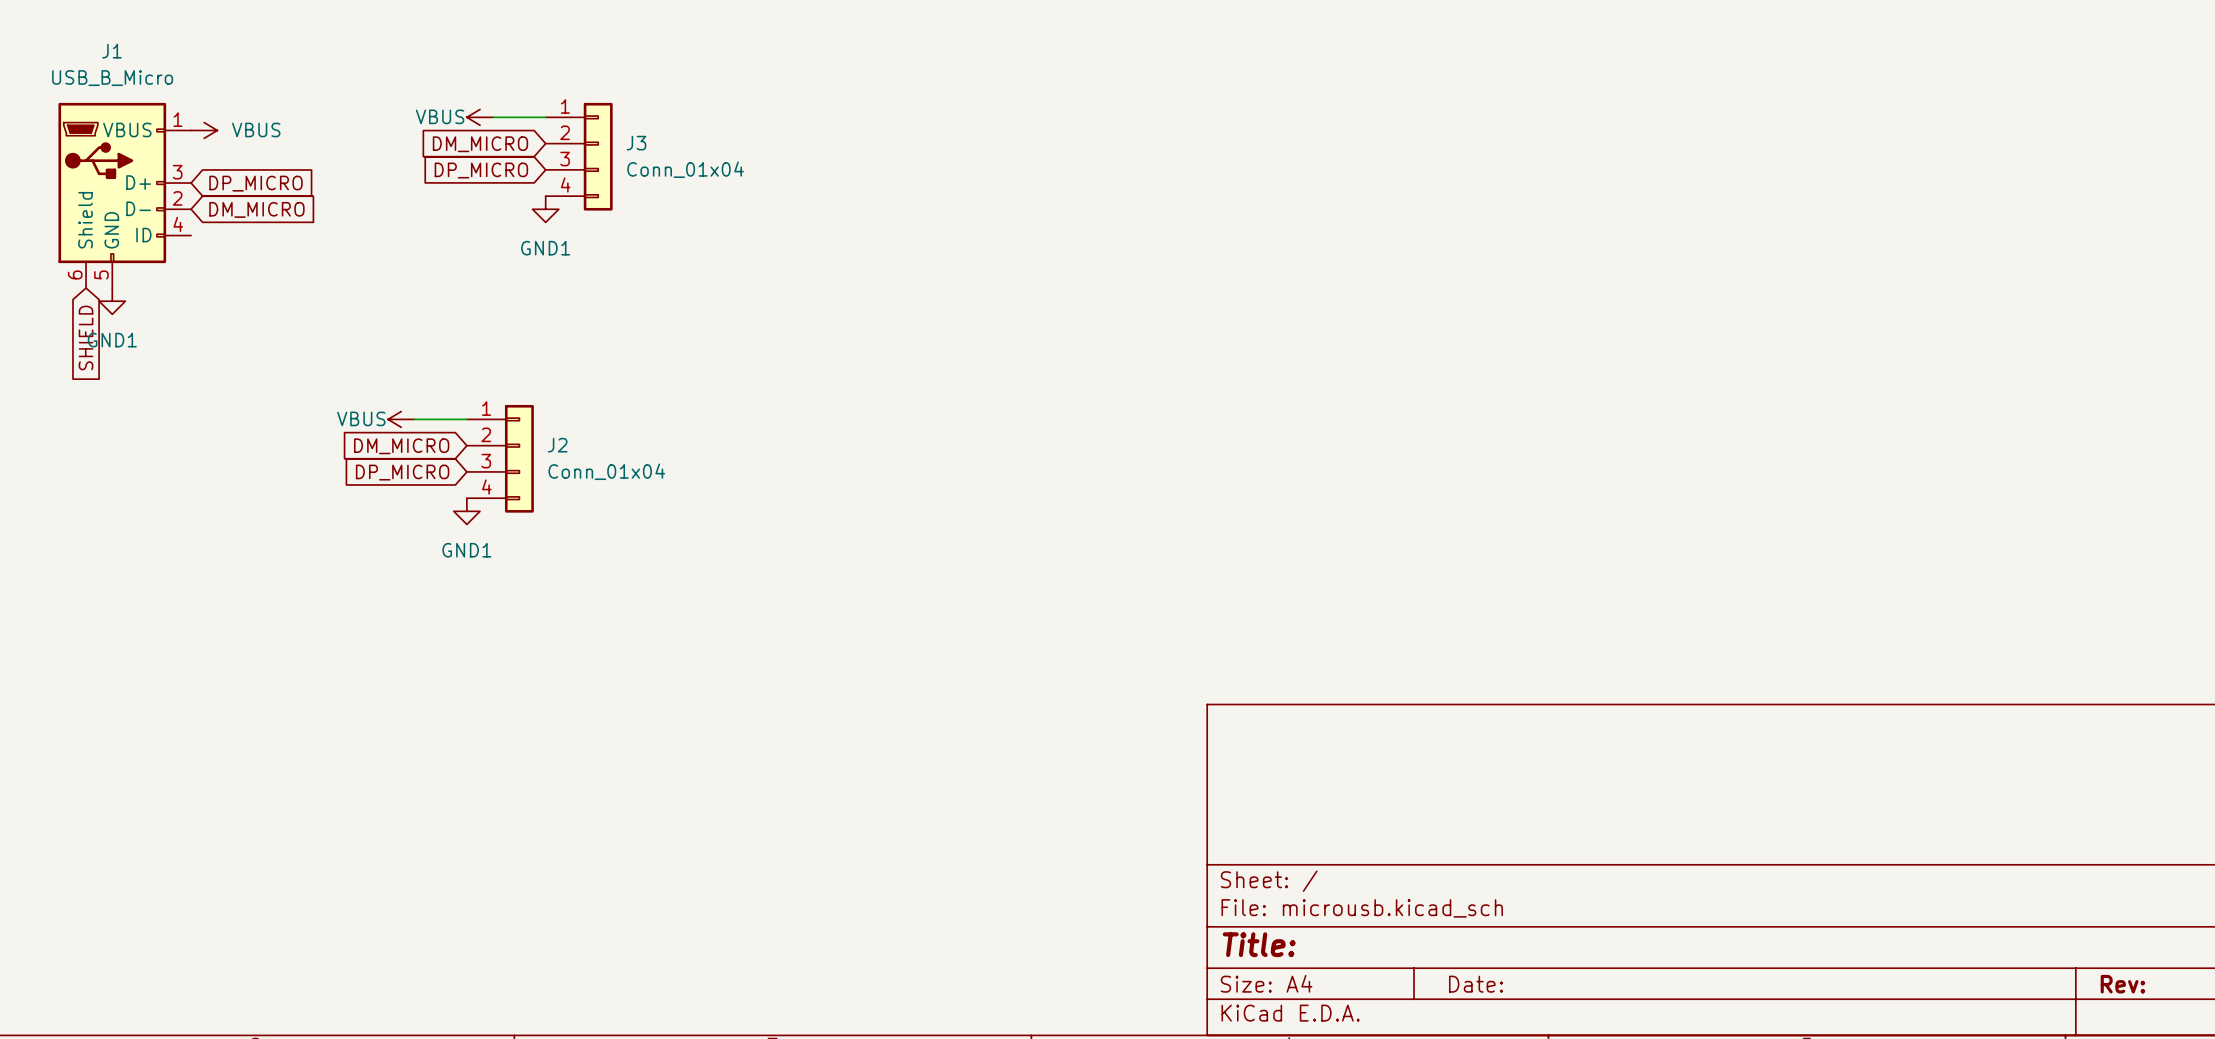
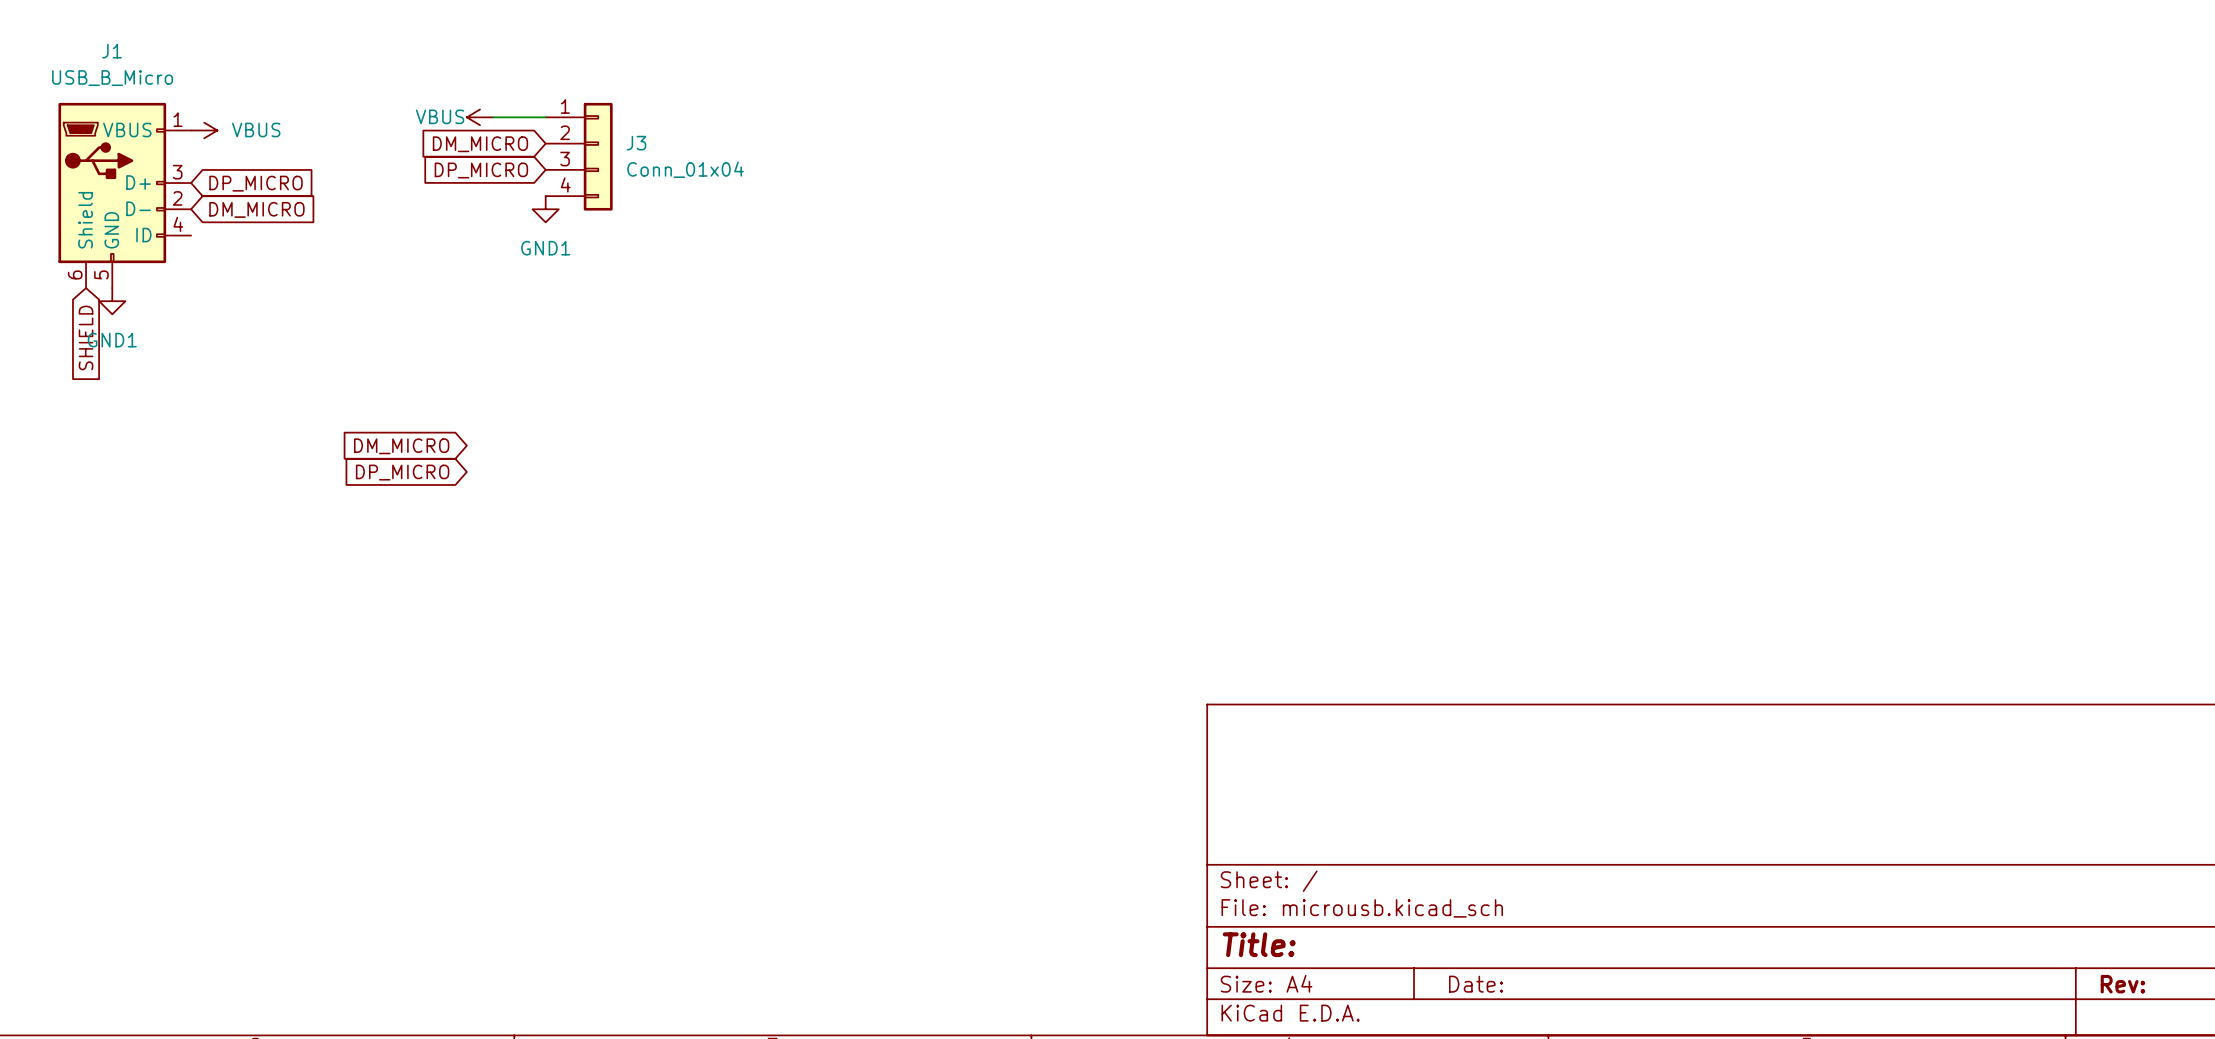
power symbol: VBUS (401, 419) -> none
wire: (414, 419) (466, 419) -> none
J2: Conn_01x04 (500, 458) -> none
power symbol: GND1 (466, 511) -> none

